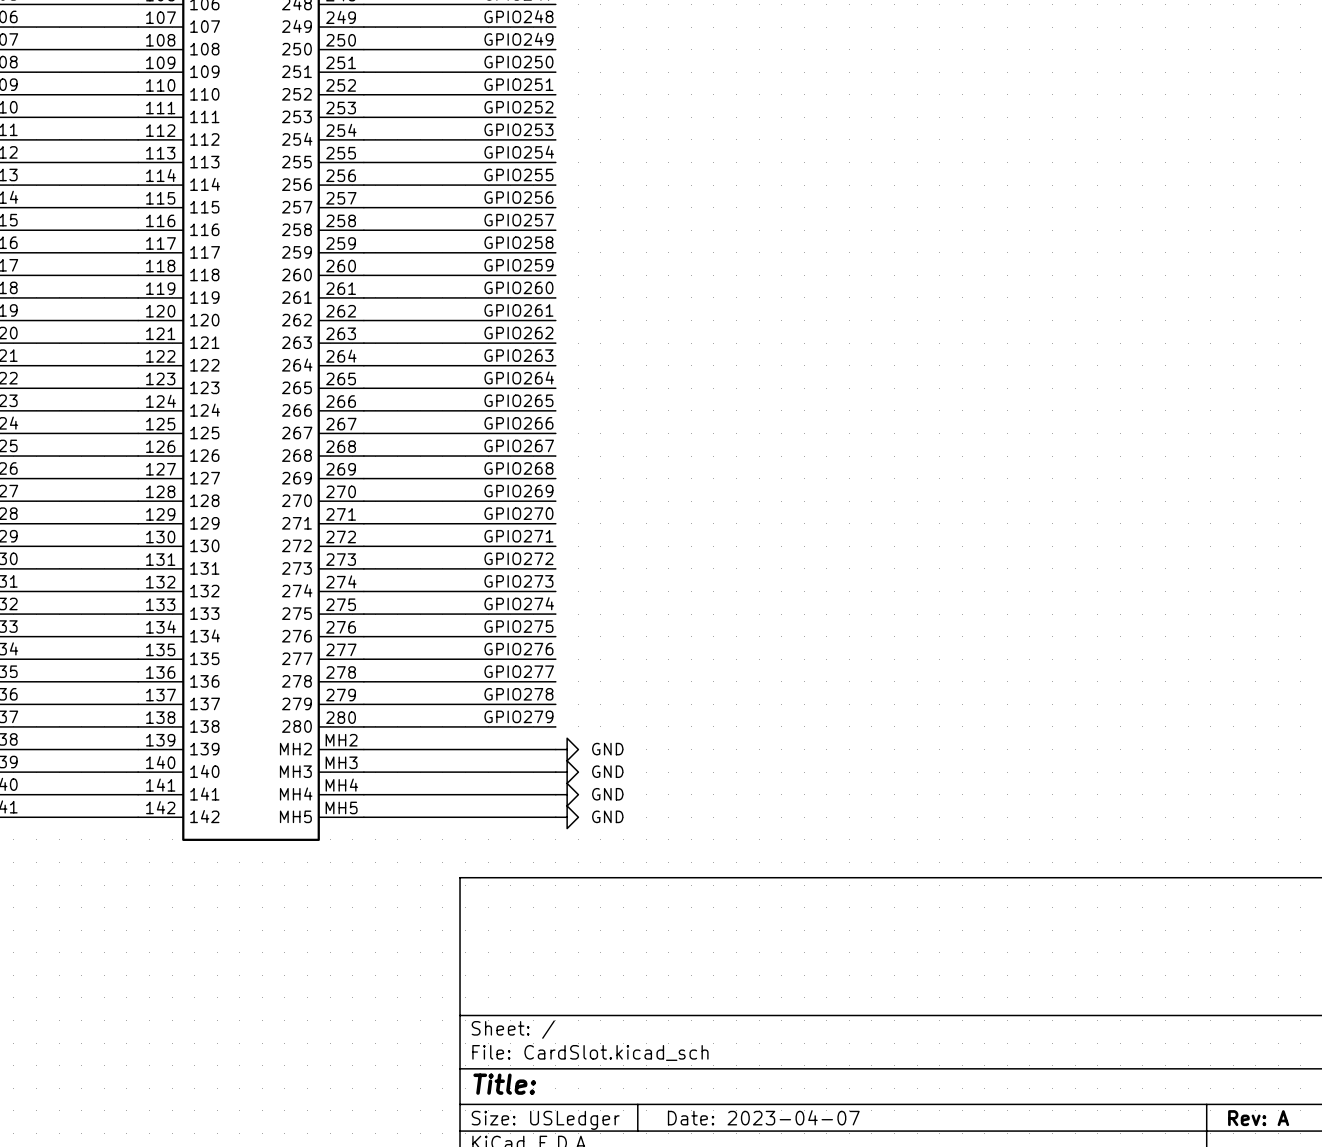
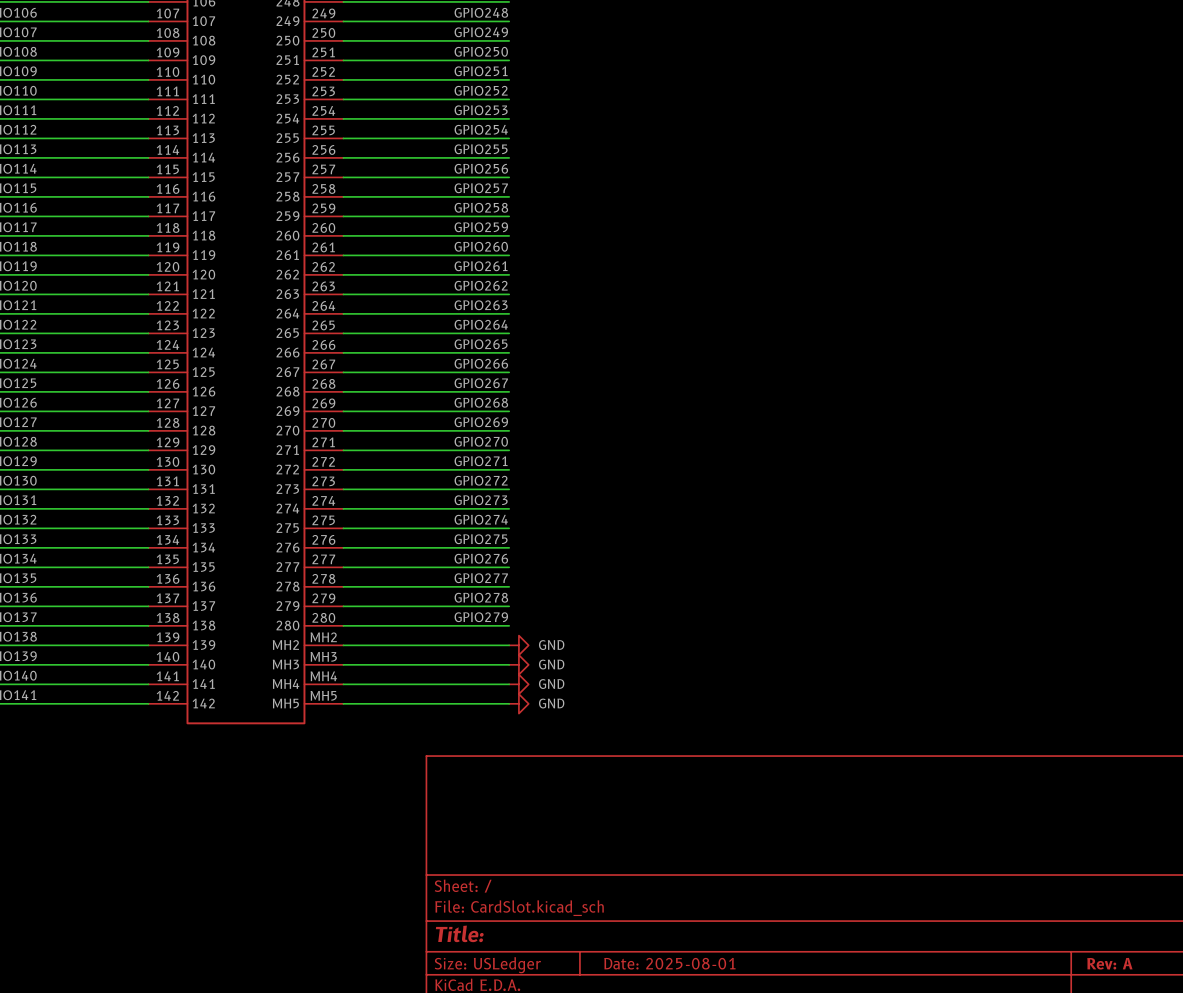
title block: Date: 2023-04-07 (763, 1117) -> Date: 2025-08-01 (669, 963)

